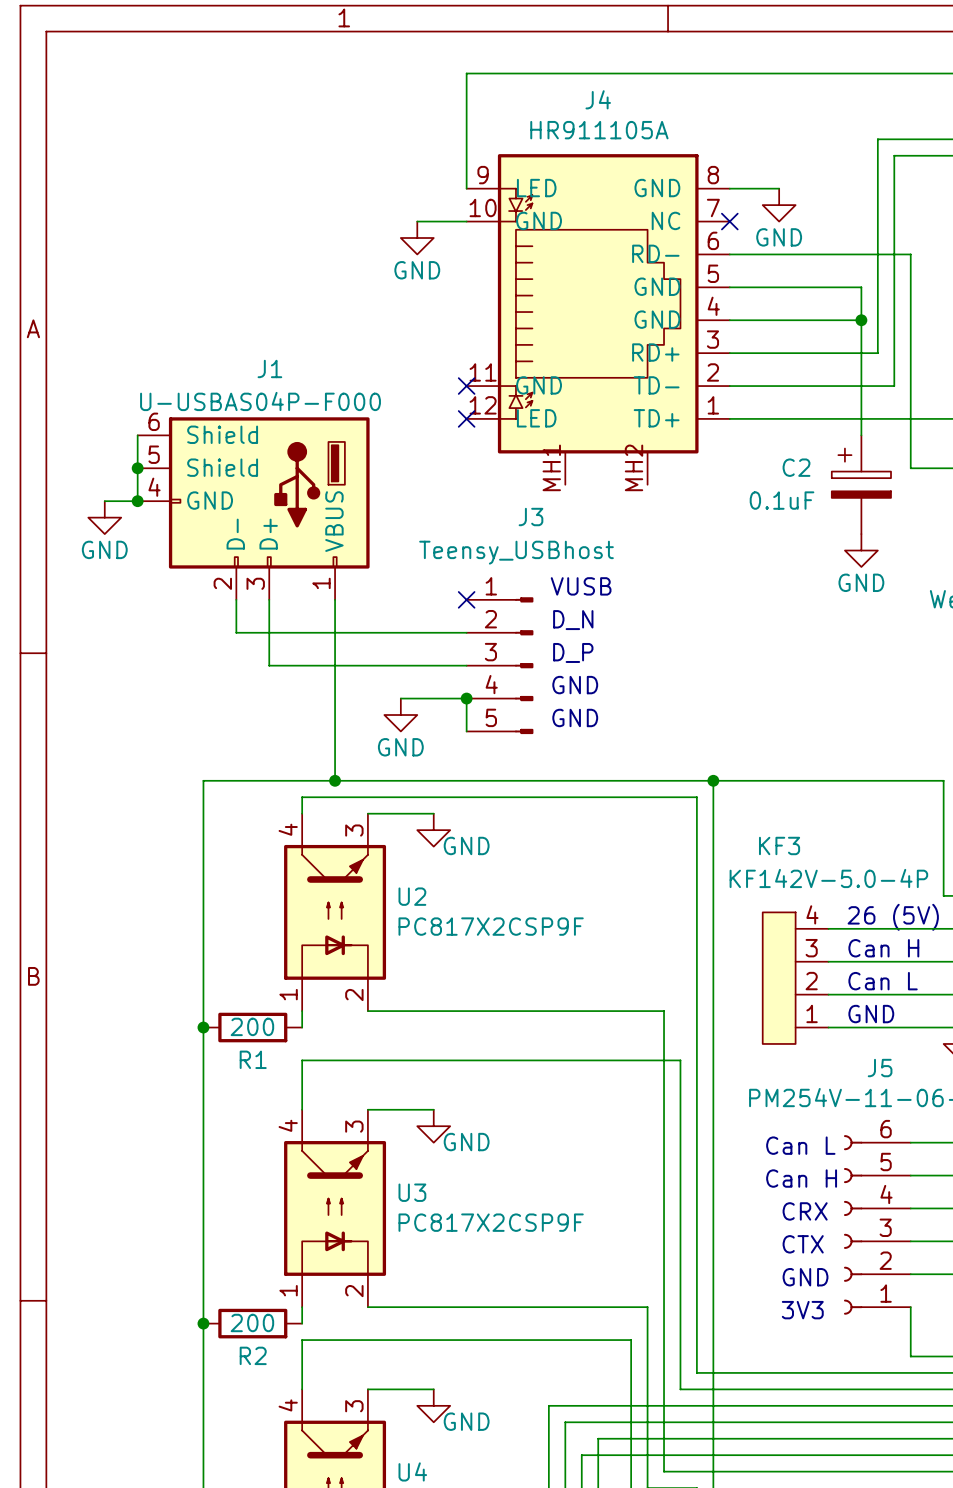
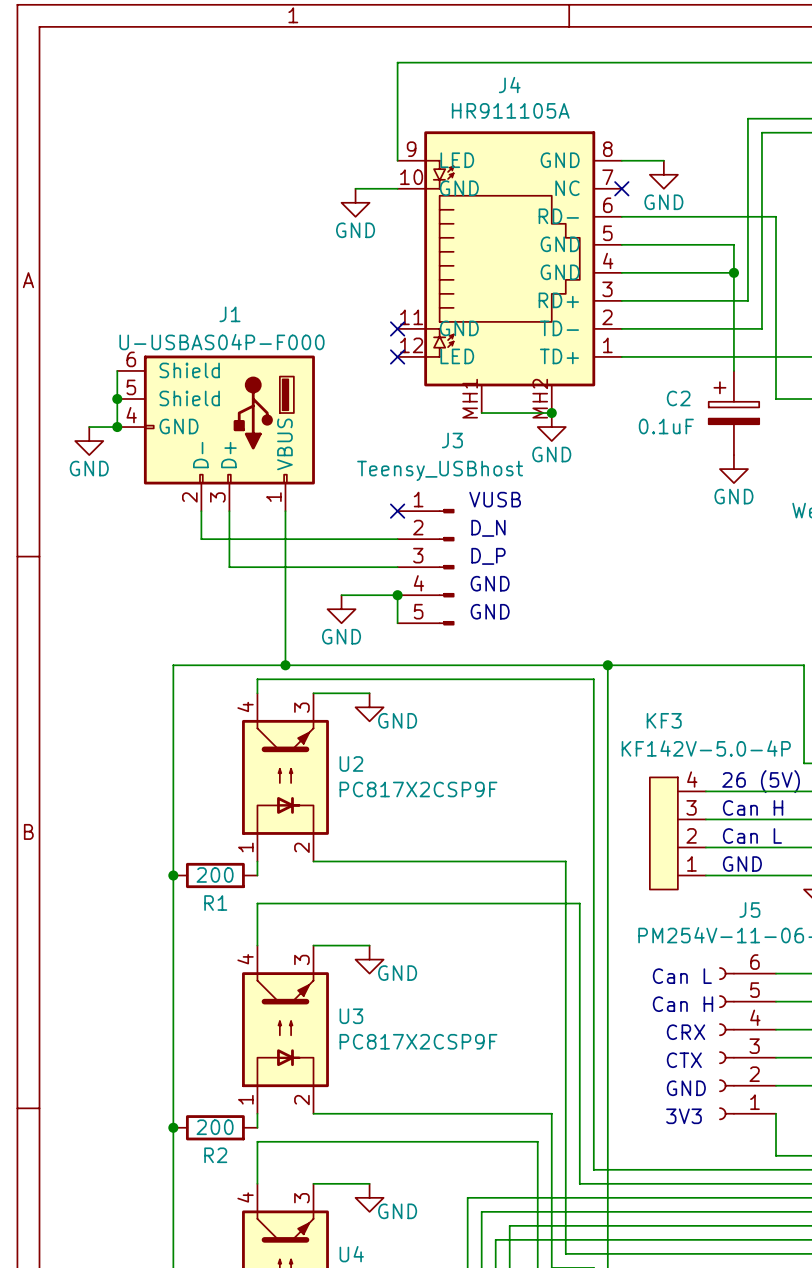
wire: none -> (481, 413) (551, 413)
junction: none -> (551, 413)
power symbol: none -> GND (551, 427)

